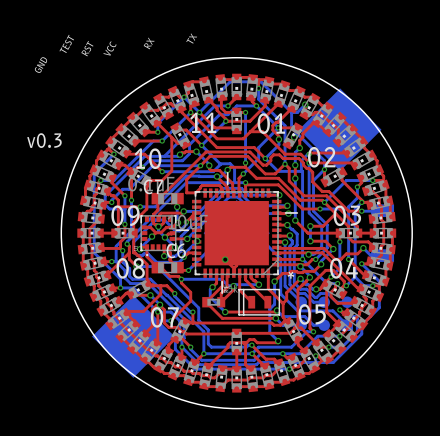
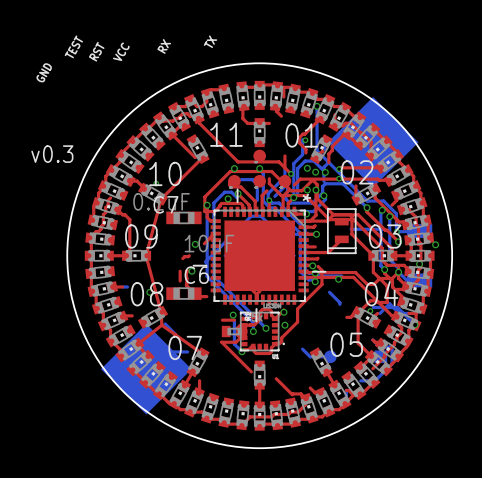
bottom track: (258, 88) (258, 99) (285, 125) (285, 164) -> none
via: (258, 88) -> none
top track: (236, 95) (228, 105) -> none
bottom track: none -> (317, 106) (317, 150) (367, 201) (383, 201) (396, 213) (396, 230) (398, 232)
via: (184, 97) -> none
top track: (208, 98) (228, 121) (249, 121) (265, 105) (265, 98) -> none
top track: (194, 102) (190, 105) (190, 112) (217, 138) (243, 138) (279, 102) -> none
bottom track: (305, 104) (297, 112) (291, 112) -> none
via position: (305, 104) -> (317, 106)
bottom track: (228, 105) (214, 105) (164, 156) -> none
via: (228, 105) -> none
via: (256, 105) -> none
bottom track: (190, 112) (162, 141) (153, 141) (113, 180) (100, 180) -> none
via: (190, 112) -> none
top track: (199, 112) (214, 127) (234, 127) (236, 129) -> none
via: (199, 112) -> none
bottom track: (245, 112) (245, 162) -> none
via: (245, 112) -> none
bottom track: (291, 112) (291, 127) (324, 160) (324, 169) (313, 180) (313, 211) (327, 224) (327, 247) (315, 259) -> none
bottom track: (291, 112) (260, 81) (230, 81) (199, 112) (184, 97) (157, 123) (157, 132) -> none
bottom track: (225, 121) (201, 145) (220, 164) (213, 171) (162, 171) -> none
via: (225, 121) -> none
bottom track: none -> (302, 139) (302, 154) (293, 163) (293, 197) (297, 193) (297, 168) (305, 161) (313, 161) (325, 172)
top track: (278, 127) (297, 128) -> none
top track: (176, 128) (186, 130) (201, 145) -> none
top track: (144, 130) (157, 132) -> none
top track: (250, 131) (262, 131) (285, 154) (300, 154) (309, 162) (355, 164) -> (294, 184) (300, 179) (390, 180)
via: (157, 132) -> none
top track: (171, 137) (171, 170) (162, 180) (147, 181) (146, 209) (133, 222) (133, 252) (147, 264) (147, 284) (153, 285) -> none
via: (294, 137) -> none
bottom track: (278, 139) (278, 144) (265, 158) (278, 171) (302, 171) (302, 259) (326, 283) (337, 283) -> none
via: (278, 139) -> none
top track: (134, 141) (162, 141) -> none
via: (162, 141) -> none
top track: none -> (284, 155) (284, 168)
top track: none -> (202, 157) (161, 198) (146, 255) (161, 312) (161, 325)
via: (201, 145) -> none
via: (299, 148) -> none
top track: (107, 149) (113, 154) -> none
top track: (196, 151) (185, 151) (179, 154) -> none
bottom track: (196, 151) (209, 165) -> none
via: (196, 151) -> none
top track: (125, 152) (127, 154) (144, 154) (162, 171) -> none
via: none -> (234, 168)
bottom track: none -> (259, 168) (263, 173) (263, 201) (270, 207) (275, 207) (300, 233) (300, 271) (308, 279) (315, 281)
via: none -> (259, 168)
bottom track: none -> (284, 168) (284, 176) (268, 193) (268, 199) (272, 203) (279, 203) (305, 229) (305, 269) (308, 273) (315, 273) (318, 276) (341, 276)
via: none -> (307, 168)
bottom track: (113, 154) (94, 173) (94, 252) (120, 279) (120, 287) (133, 287) (157, 312) (170, 312) (179, 320) (179, 336) (175, 340) (175, 349) (195, 369) (289, 369) -> none
via: (113, 154) -> none
bottom track: (179, 154) (178, 156) (144, 156) (105, 195) (105, 204) (109, 209) (124, 209) -> none
via: (179, 154) -> none
bottom track: (309, 154) (301, 160) (301, 171) -> none
via: none -> (315, 172)
via: none -> (325, 172)
via: (245, 162) -> none
bottom track: (309, 162) (309, 213) (321, 225) (321, 246) (314, 253) (308, 254) -> none
via: (285, 164) -> none
bottom track: (200, 165) (152, 165) (129, 189) (122, 189) (111, 202) -> none
via: (200, 165) -> none
via: (209, 165) -> none
top track: (295, 165) (295, 178) -> none
via: (295, 165) -> none
top track: (142, 167) (138, 167) (131, 173) (131, 200) -> none
bottom track: (142, 167) (149, 160) (182, 160) (189, 153) (189, 144) (219, 114) (228, 114) (236, 105) (256, 105) (278, 127) (258, 147) (258, 158) (243, 173) -> none
top track: (245, 167) (230, 167) (227, 169) -> none
bottom track: (227, 169) (220, 176) (186, 176) (155, 206) (140, 206) -> none
via: (227, 169) -> none
via: (324, 169) -> none
via: (162, 171) -> none
via: (243, 173) -> none
top track: none -> (288, 190) (283, 196) (281, 211)
via: none -> (307, 190)
top track: none -> (315, 190) (315, 215) (310, 221)
via: none -> (315, 190)
top track: (111, 177) (111, 182) (124, 195) -> none
bottom track: (295, 178) (295, 220) -> none
bottom track: none -> (274, 196) (287, 183) (285, 199) (289, 203) (312, 203) (322, 192) (322, 186) (325, 183) (343, 183) (367, 207)
via: (100, 180) -> none
bottom track: none -> (236, 197) (231, 192) (224, 192) (213, 203) (213, 276) (266, 328)
top track: none -> (293, 197) (288, 203) (288, 211)
via: none -> (293, 197)
top track: (372, 180) (383, 180) -> (222, 320) (234, 320)
bottom track: (372, 180) (346, 180) (324, 202) -> none
via: (372, 180) -> none
via: none -> (228, 198)
bottom track: none -> (325, 199) (313, 211) (305, 211)
bottom track: (245, 182) (186, 182) (127, 241) (127, 244) -> none
top track: (245, 184) (278, 184) (302, 209) (320, 209) -> none
top track: none -> (207, 205) (207, 217) (210, 221) (215, 221)
bottom track: none -> (207, 205) (207, 276) (253, 322) (253, 331)
via: none -> (207, 205)
bottom track: (357, 187) (357, 198) (348, 206) (348, 259) -> none
via: (357, 187) -> none
top track: none -> (367, 207) (367, 212) (398, 241)
via: none -> (367, 207)
bottom track: none -> (382, 210) (380, 265) (384, 269)
via: none -> (382, 210)
bottom track: (124, 195) (124, 224) -> none
via: (124, 195) -> none
bottom track: (279, 195) (248, 195) (241, 188) (222, 188) (199, 211) (183, 211) -> none
bottom track: none -> (389, 216) (389, 259) (398, 268)
via: none -> (389, 216)
bottom track: (131, 200) (131, 230) (116, 246) (116, 261) (125, 270) (125, 278) (130, 283) (148, 283) (184, 318) (184, 338) (181, 340) (181, 347) (199, 364) (333, 362) (361, 334) (361, 325) (379, 307) (379, 281) (361, 263) -> none
via: (131, 200) -> none
top track: (111, 202) (103, 202) (100, 204) (100, 217) (89, 228) (89, 244) (92, 246) (92, 259) (98, 279) (98, 285) (103, 290) (103, 294) (107, 298) (107, 303) (111, 307) (113, 314) (146, 349) (166, 362) (179, 366) (184, 371) (214, 377) (223, 369) (236, 370) -> none
via: (111, 202) -> none
via: (324, 202) -> none
bottom track: (361, 202) (355, 209) (355, 276) -> none
via: (361, 202) -> none
bottom track: (287, 205) (252, 205) (239, 192) (224, 192) (181, 236) (181, 250) (175, 256) (164, 256) -> none
via: (287, 205) -> none
top track: (118, 206) (140, 206) -> none
via: (140, 206) -> none
bottom track: (177, 206) (178, 222) -> none
via: (177, 206) -> none
via: (320, 209) -> none
top track: (183, 211) (182, 213) (161, 213) (158, 219) -> none
via: (183, 211) -> none
top track: (361, 211) (348, 211) (328, 191) (322, 191) (312, 181) (312, 172) (298, 158) (283, 158) (279, 154) (273, 154) (266, 165) (263, 165) (249, 151) (206, 151) (157, 198) (157, 210) (153, 214) (153, 223) (161, 224) (164, 219) -> none
top track: (335, 213) (323, 226) (310, 226) -> none
top track: none -> (341, 239) (328, 252) (303, 252)
top track: (295, 220) (307, 233) (340, 233) (339, 241) -> none
via: (295, 220) -> none
via: none -> (398, 241)
top track: (178, 222) (172, 227) (166, 227) (161, 232) (155, 232) (152, 236) -> none
bottom track: (186, 222) (179, 230) (175, 230) (164, 219) (155, 219) (133, 241) (133, 251) (137, 255) (148, 253) (156, 262) (179, 262) (197, 241) -> none
via: (186, 222) -> none
via: none -> (435, 244)
top track: (124, 224) (124, 237) (120, 241) (120, 248) -> none
via: (124, 224) -> none
bottom track: (287, 225) (297, 234) (297, 245) (294, 247) (294, 282) (300, 289) (306, 289) (315, 297) (320, 293) (327, 293) (336, 302) (347, 302) -> none
via: (287, 225) -> none
bottom track: (158, 226) (158, 230) (175, 247) -> none
via: (158, 226) -> none
bottom track: (310, 226) (310, 241) -> none
via: (310, 226) -> none
top track: (144, 227) (150, 227) (155, 232) -> none
part rotation: 0° (237, 233) -> 90° counterclockwise (259, 255)
part rotation: 0° (158, 235) -> 90° counterclockwise (262, 331)
part position: (158, 235) -> (262, 331)
bottom track: (289, 235) (292, 240) (289, 246) (289, 284) (298, 293) (304, 293) (313, 302) (324, 302) -> none
via: (289, 235) -> none
bottom track: (152, 236) (140, 249) -> none
via: (152, 236) -> none
via: (164, 237) -> none
top track: (172, 238) (187, 238) -> none
via: (187, 238) -> none
via: none -> (419, 264)
via: (197, 241) -> none
top track: (310, 241) (325, 241) (333, 249) -> none
via: (310, 241) -> none
bottom track: (339, 241) (339, 268) (331, 276) -> none
via: (339, 241) -> none
bottom track: (285, 242) (285, 286) (301, 302) -> none
top track: none -> (318, 266) (321, 270) (321, 284) (297, 308) (297, 322) (281, 337) (281, 341) (276, 343) (269, 353) (256, 353) (253, 346) (242, 351)
top track: (127, 244) (129, 246) (129, 259) (136, 266) -> none
via: (127, 244) -> none
top track: none -> (398, 268) (398, 278) (407, 287)
via: none -> (384, 269)
top track: (99, 247) (120, 248) -> none
top track: (140, 249) (146, 247) (146, 256) (169, 276) (178, 276) (181, 279) (181, 283) (190, 292) (190, 301) (170, 320) -> none
via: (140, 249) -> none
via: none -> (315, 273)
bottom track: (333, 249) (321, 261) -> none
via: (333, 249) -> none
bottom track: (122, 250) (122, 262) (129, 268) -> none
via: (122, 250) -> none
top track: (129, 252) (105, 275) -> none
top track: (196, 253) (188, 252) (184, 257) -> none
via: (164, 256) -> none
via: none -> (315, 281)
via: (184, 257) -> none
via: (225, 259) -> none
top track: (276, 259) (302, 259) -> none
via: (302, 259) -> none
top track: (315, 259) (312, 259) (307, 264) (300, 264) -> none
via: (315, 259) -> none
top track: (348, 259) (366, 276) (367, 275) -> (384, 269) (384, 273) (392, 281) (392, 287) (403, 297) (403, 302)
via: (348, 259) -> none
via: (111, 261) -> none
via: (361, 263) -> none
top track: (276, 264) (300, 264) -> none
top track: (321, 264) (314, 271) (291, 271) (289, 273) (282, 273) (274, 281) -> none
via: (321, 264) -> none
bottom track: (136, 266) (157, 266) (198, 307) (198, 320) (208, 329) (208, 343) (211, 347) (246, 347) (251, 345) -> none
via: (300, 266) -> none
bottom track: (129, 268) (129, 276) (132, 279) (150, 279) (203, 331) (203, 353) (252, 353) (258, 347) (291, 347) (306, 331) (313, 331) -> none
bottom track: (188, 270) (223, 235) (255, 233) (280, 258) (280, 293) (297, 310) (332, 310) (347, 325) -> none
via: (188, 270) -> none
top track: (216, 273) (216, 283) (212, 287) -> none
top track: (222, 273) (222, 286) (206, 302) (222, 318) (275, 318) -> none
top track: (227, 273) (227, 287) (221, 293) (221, 302) (233, 289) (233, 286) -> none
top track: (239, 273) (239, 290) (251, 302) -> none
top track: (245, 273) (245, 279) (267, 302) -> none
top track: (251, 273) (251, 277) (258, 284) -> none
top track: (268, 273) (268, 288) (283, 303) -> none
top track: (331, 276) (324, 283) (326, 285) (326, 312) (338, 325) (328, 335) -> (303, 221) (327, 221) (333, 214) (350, 214) (351, 216) (351, 234) (373, 255) (373, 272) (387, 286) (387, 302) (370, 300) (358, 312) (358, 343) (371, 356) (360, 367)
via: (331, 276) -> none
top track: (309, 277) (297, 289) (297, 324) (294, 327) -> none
via: (309, 277) -> none
top track: (300, 278) (286, 292) (286, 299) (283, 303) (283, 317) (288, 322) (285, 320) (280, 325) (274, 325) (271, 323) (184, 322) -> (161, 325) (202, 354)
bottom track: (300, 278) (312, 289) (316, 289) -> none
via: (300, 278) -> none
bottom track: (181, 279) (221, 279) (228, 285) (258, 284) -> none
via: (181, 279) -> none
bottom track: none -> (373, 307) (397, 307) (414, 324)
bottom track: (274, 281) (274, 304) (269, 309) (269, 332) (278, 341) -> none
via: (274, 281) -> none
top track: none -> (283, 310) (275, 318) (269, 309) (262, 309) (258, 320) (254, 324) (244, 325) (237, 327) (237, 335) (243, 338) (239, 338) (236, 342) (221, 342) (251, 371)
top track: (337, 283) (331, 292) (331, 296) (337, 303) (355, 301) -> none
top track: (149, 285) (166, 285) (174, 293) -> none
top track: (160, 285) (160, 294) (143, 311) (128, 311) (125, 314) (135, 323) (134, 325) -> (161, 325) (137, 344) (147, 356)
top track: (346, 285) (344, 285) (344, 281) (333, 270) (325, 270) (309, 286) (309, 328) (313, 331) -> none
via: (346, 285) -> none
via: (372, 285) -> none
via: (233, 286) -> none
via: (120, 287) -> none
bottom track: (212, 287) (210, 289) (210, 297) (225, 312) -> none
via: (316, 289) -> none
bottom track: none -> (234, 320) (234, 344) (242, 351)
bottom track: (174, 293) (174, 296) (190, 312) (192, 312) -> none
via: (174, 293) -> none
top track: (150, 295) (125, 293) (118, 301) -> none
via: (150, 295) -> none
via: none -> (284, 325)
via: none -> (414, 324)
via: none -> (266, 328)
via: none -> (253, 331)
part rotation: 0° (259, 302) -> 90° counterclockwise (341, 231)
part position: (259, 302) -> (341, 231)
part side: bottom (301, 302) -> top (284, 181)
part side: bottom (324, 302) -> top (259, 181)
part side: bottom (347, 302) -> top (234, 181)
via: (160, 304) -> none
via: (339, 309) -> none
top track: (277, 310) (225, 312) -> none
bottom track: (277, 310) (283, 316) (304, 316) (313, 325) (324, 325) -> none
via: (277, 310) -> none
top track: (157, 312) (157, 342) (155, 344) -> none
via: (157, 312) -> none
top track: (192, 312) (192, 323) -> none
via: (192, 312) -> none
via: (225, 312) -> none
via: (275, 318) -> none
via: (170, 320) -> none
via: none -> (242, 351)
part side: bottom (324, 325) -> top (259, 155)
top track: (294, 327) (289, 333) (186, 334) (177, 327) (168, 327) (164, 323) (164, 309) (160, 305) (156, 305) (152, 309) (152, 326) (144, 335) -> none
top track: (294, 327) (301, 327) (320, 347) (328, 347) -> none
via: (313, 331) -> none
bottom track: (339, 336) (317, 336) (300, 353) (260, 353) (254, 360) (201, 360) (190, 347) -> none
via: (339, 336) -> none
top track: (297, 337) (298, 344) (305, 352) (304, 360) (298, 366) (289, 369) -> (325, 370) (335, 386)
top track: (278, 341) (278, 342) (257, 342) (254, 339) (249, 339) (246, 342) (230, 342) (208, 367) -> none
via: (278, 341) -> none
top track: (243, 342) (245, 344) (245, 364) (251, 369) -> none
via: (251, 345) -> none
via: (181, 347) -> none
top track: (190, 347) (181, 338) (176, 337) (168, 344) (167, 352) -> (193, 370) (184, 386)
via: (190, 347) -> none
via: (328, 347) -> none
top track: (203, 353) (194, 363) -> none
via: (203, 353) -> none
top track: (252, 353) (265, 367) -> none
via: (252, 353) -> none
via: (282, 353) -> none
via: (315, 355) -> none
via: (289, 369) -> none

